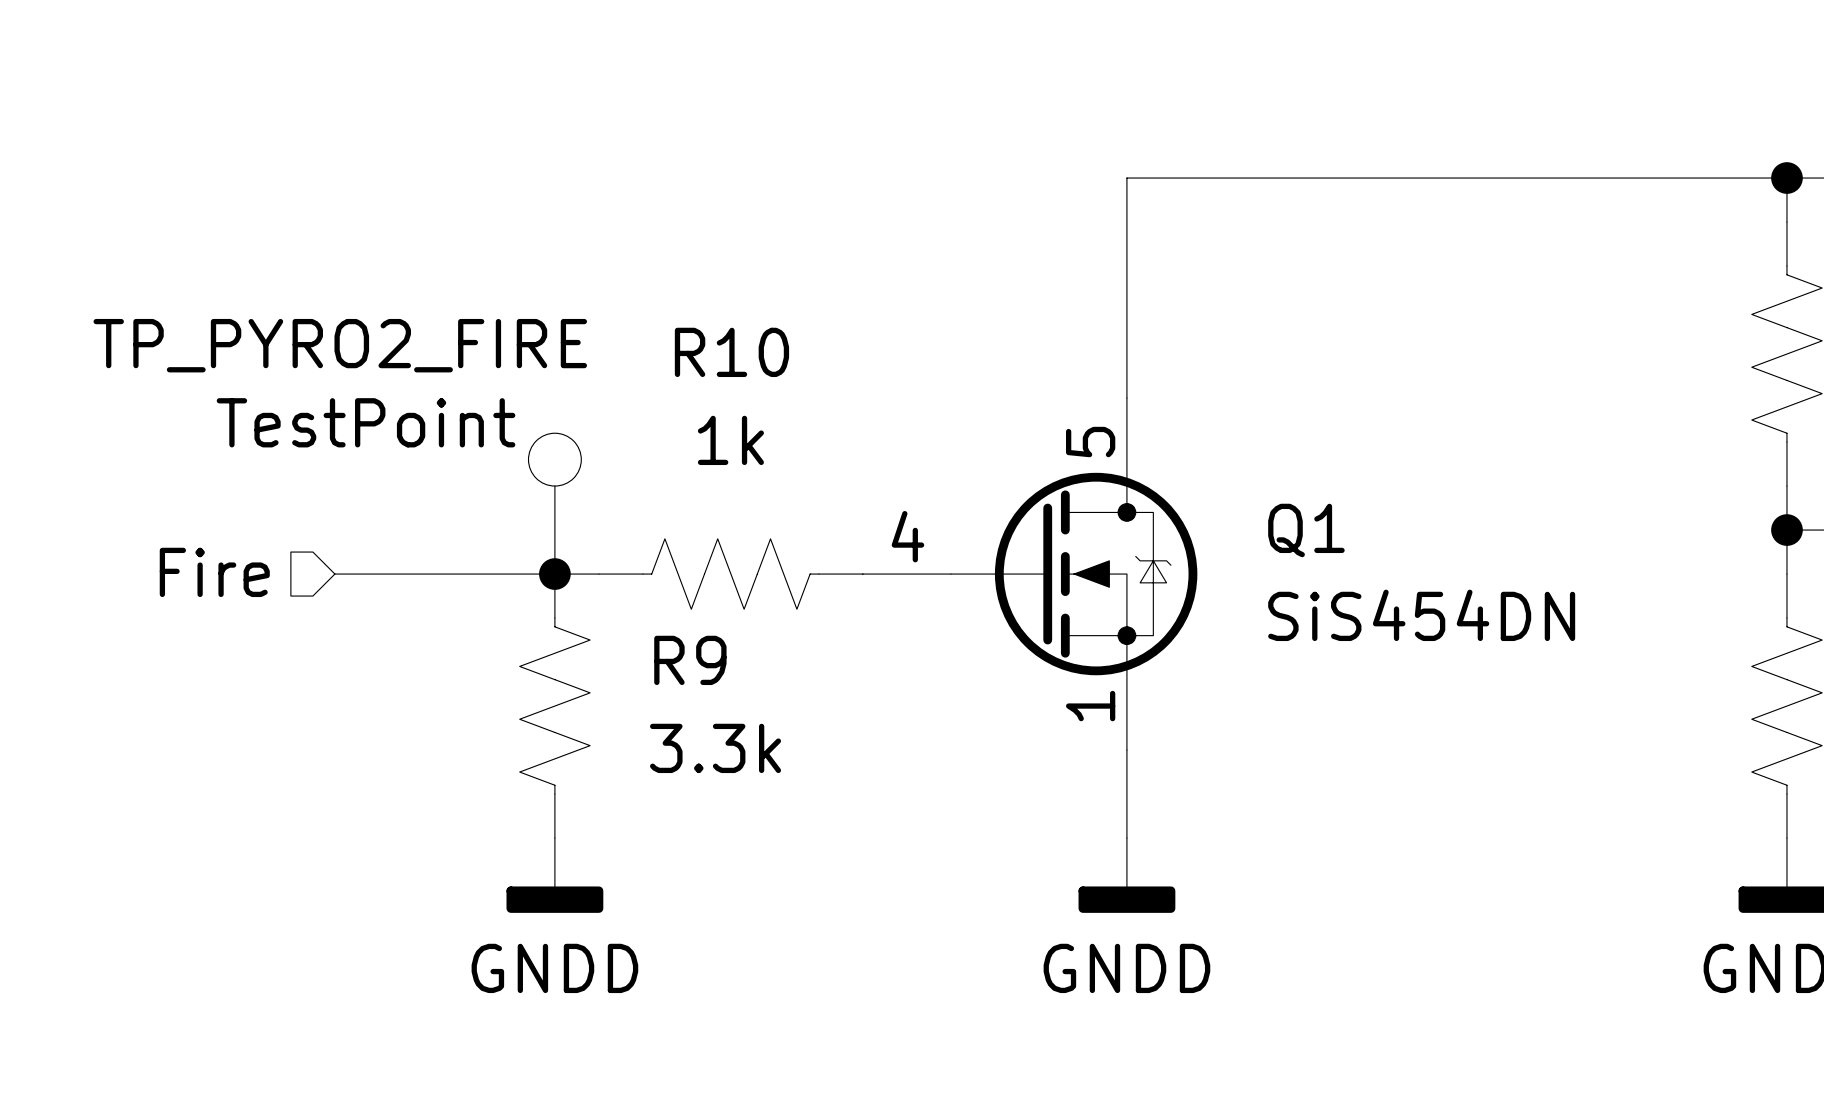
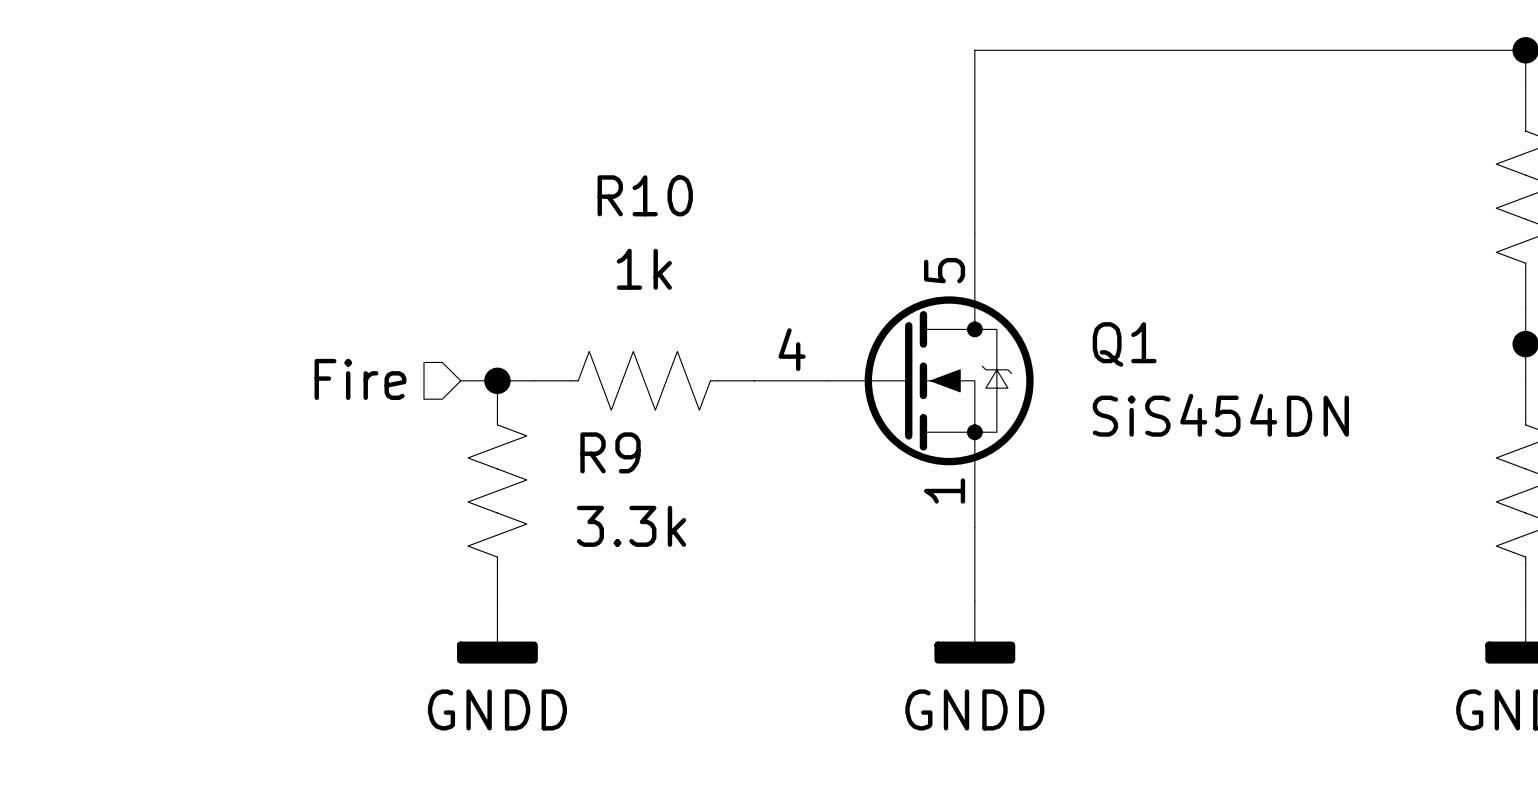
TP_PYRO2_FIRE: TestPoint (554, 503) -> none
hierarchical label position: Fire (214, 572) -> Fire (360, 379)
wire: (334, 574) (510, 574) -> none

